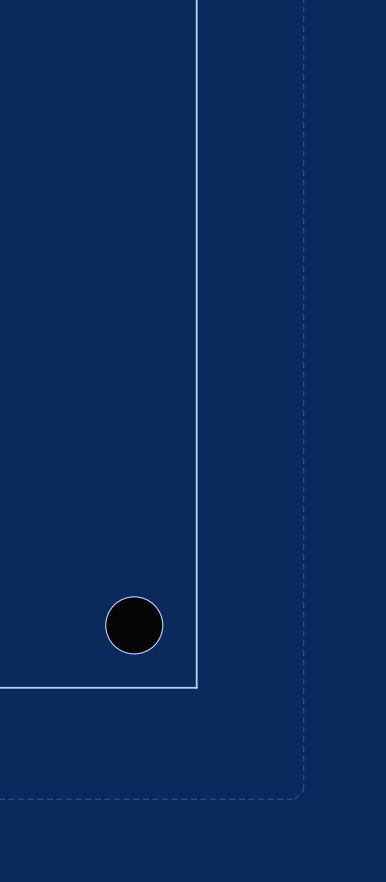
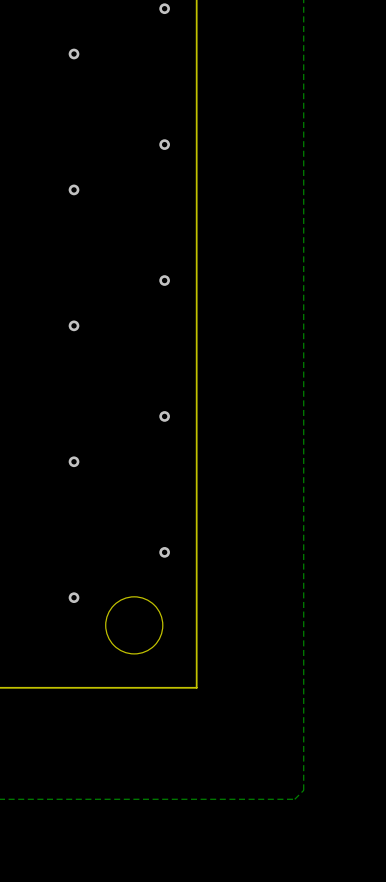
via: none -> (164, 8)
via: none -> (74, 53)
via: none -> (164, 144)
via: none -> (74, 189)
via: none -> (164, 280)
via: none -> (74, 325)
via: none -> (164, 416)
via: none -> (74, 461)
via: none -> (164, 552)
via: none -> (74, 597)

